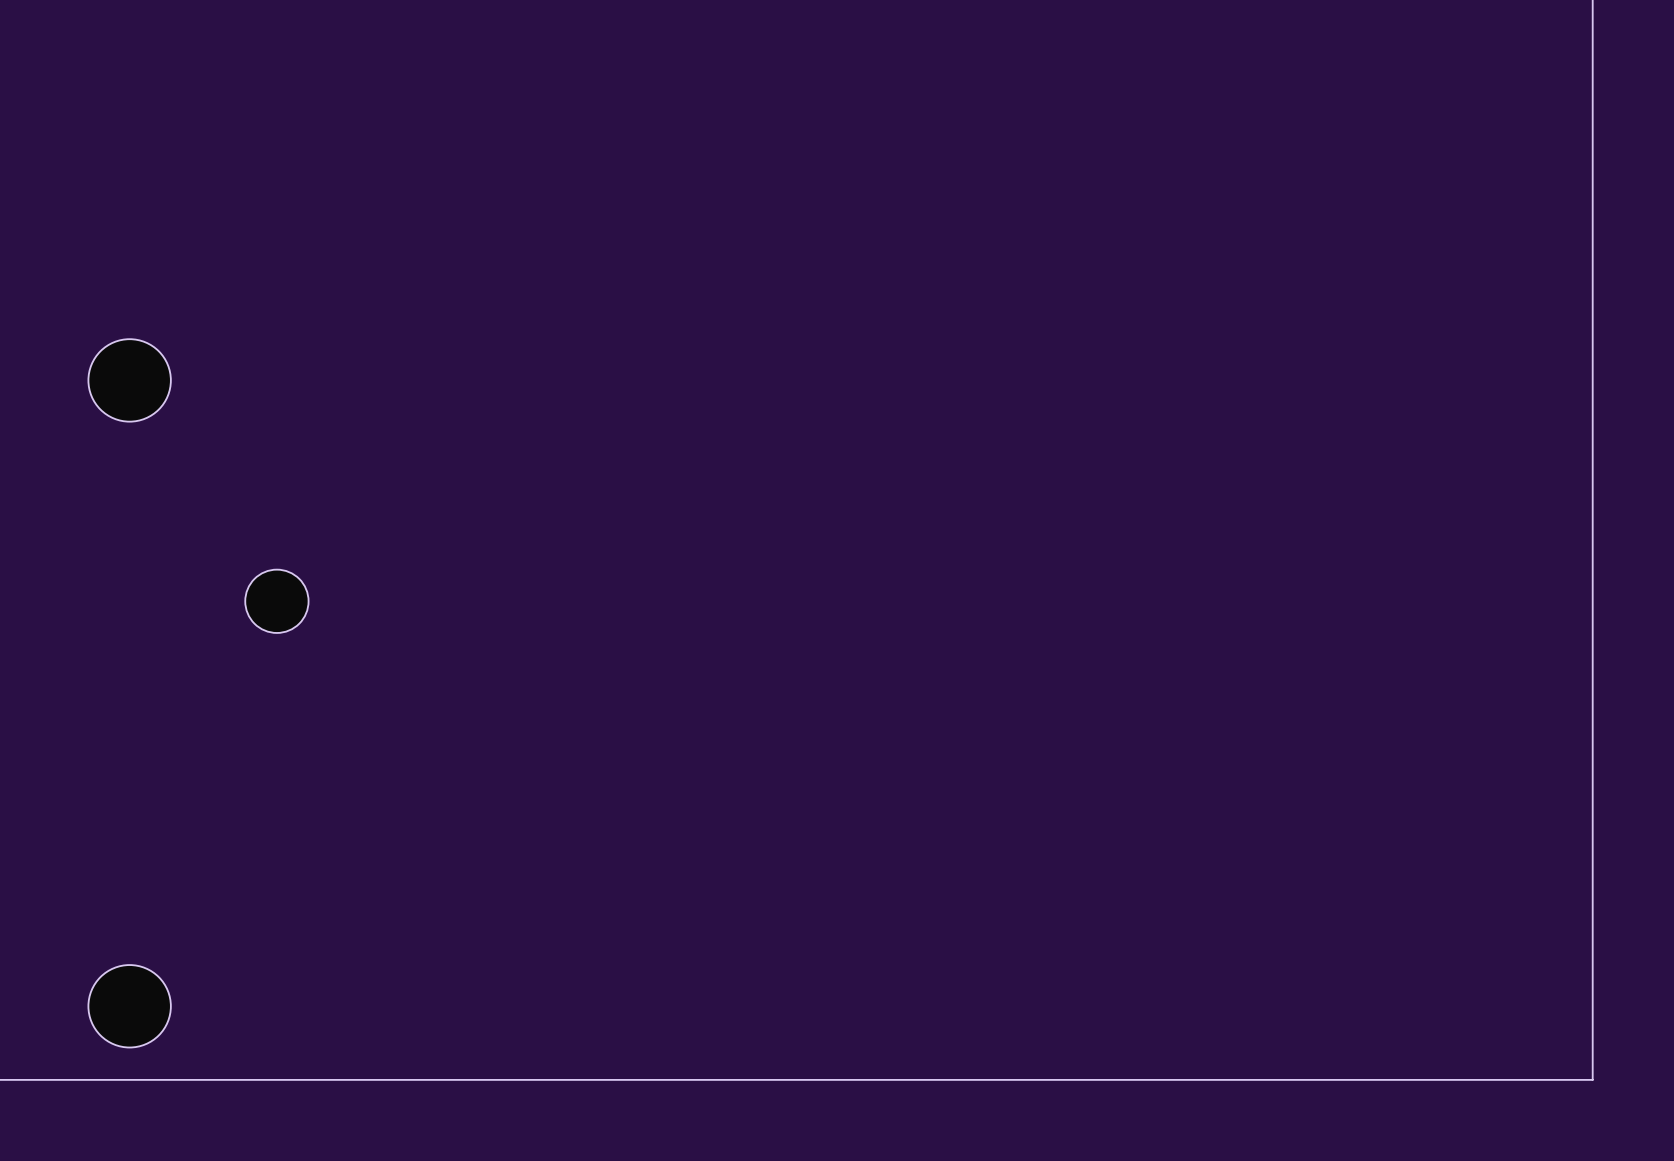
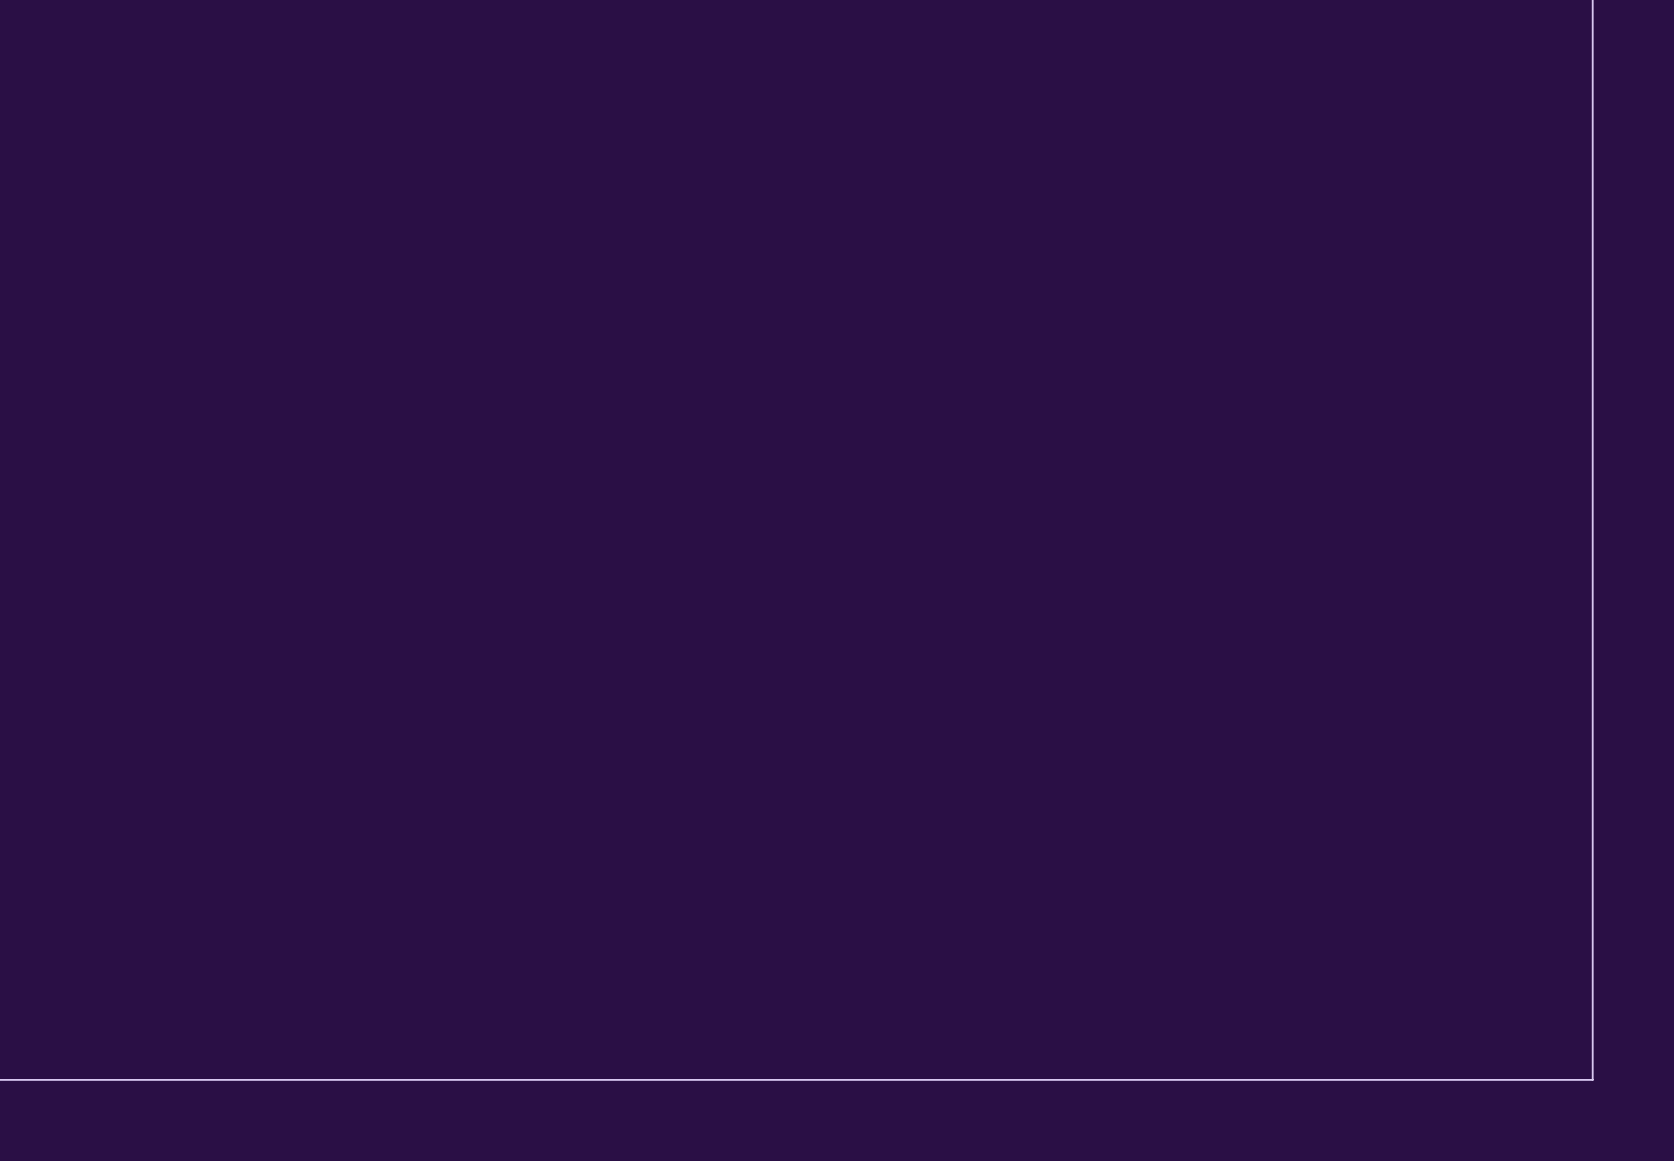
hole: (129, 380) -> none
hole: (276, 601) -> none
hole: (129, 1006) -> none

